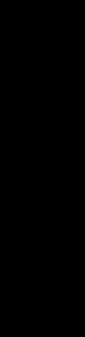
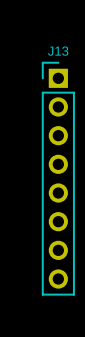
J13: none -> (58, 178)

